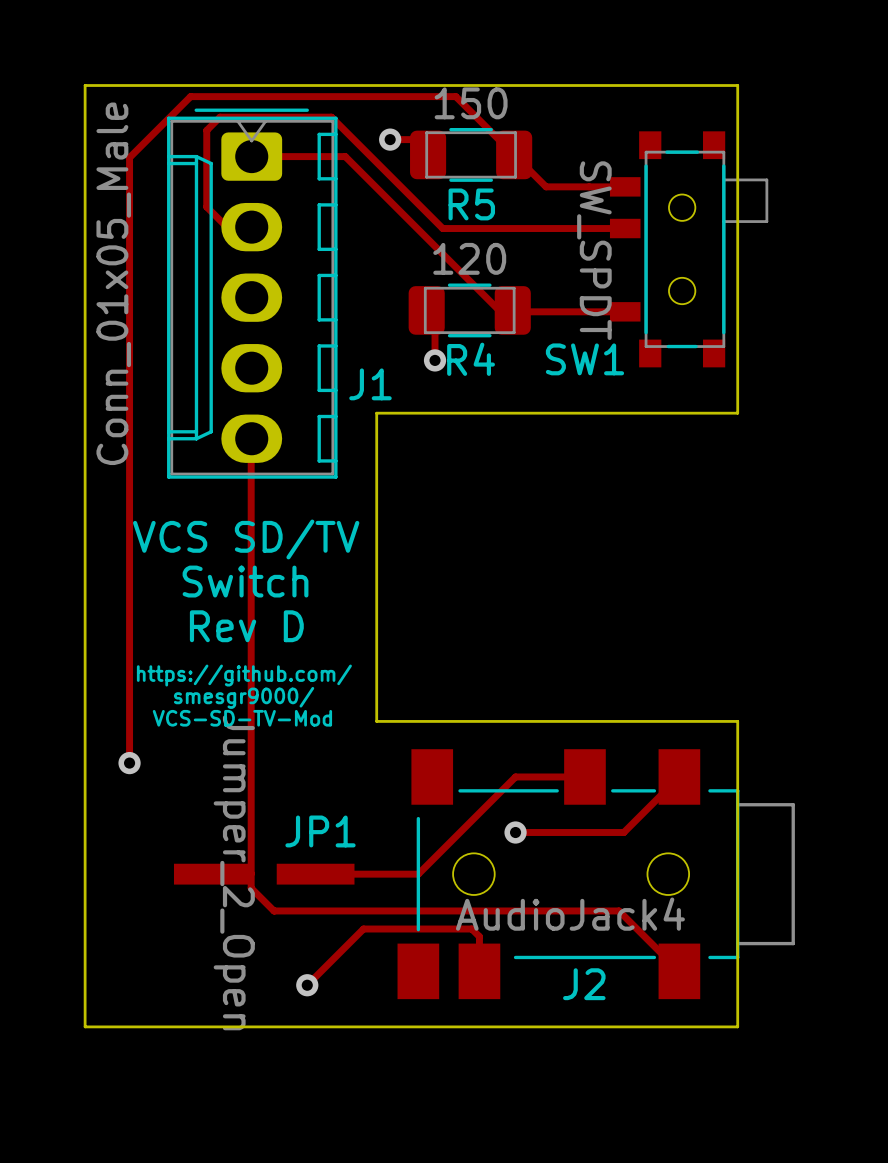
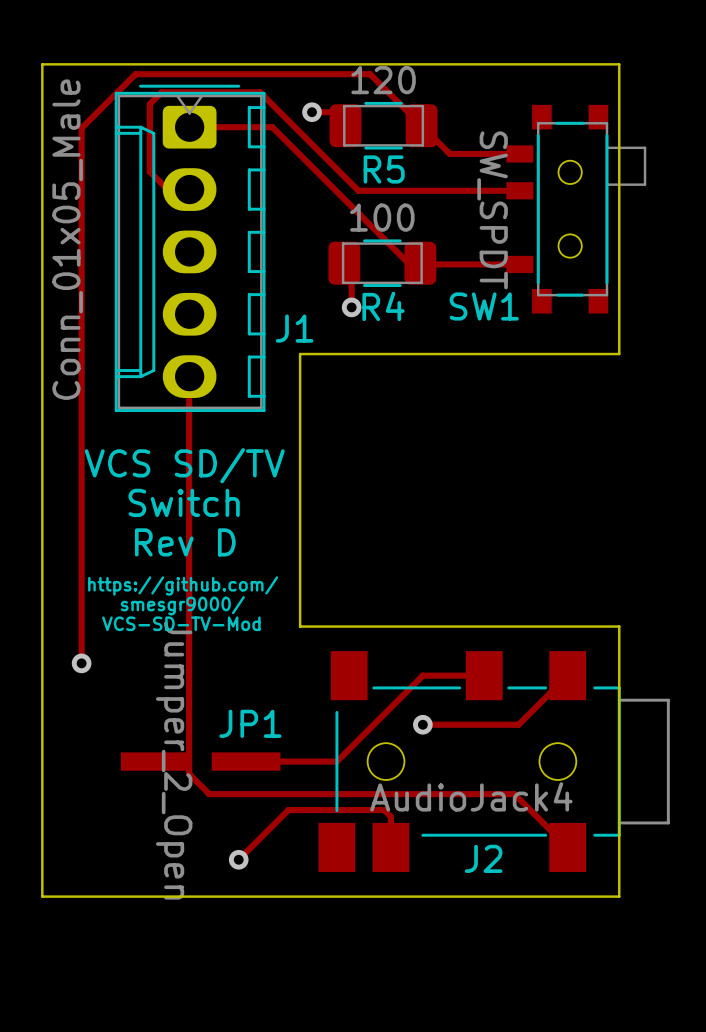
R5 value: 150 (471, 103) -> 120 (383, 80)
R4 value: 120 (469, 258) -> 100 (382, 217)

